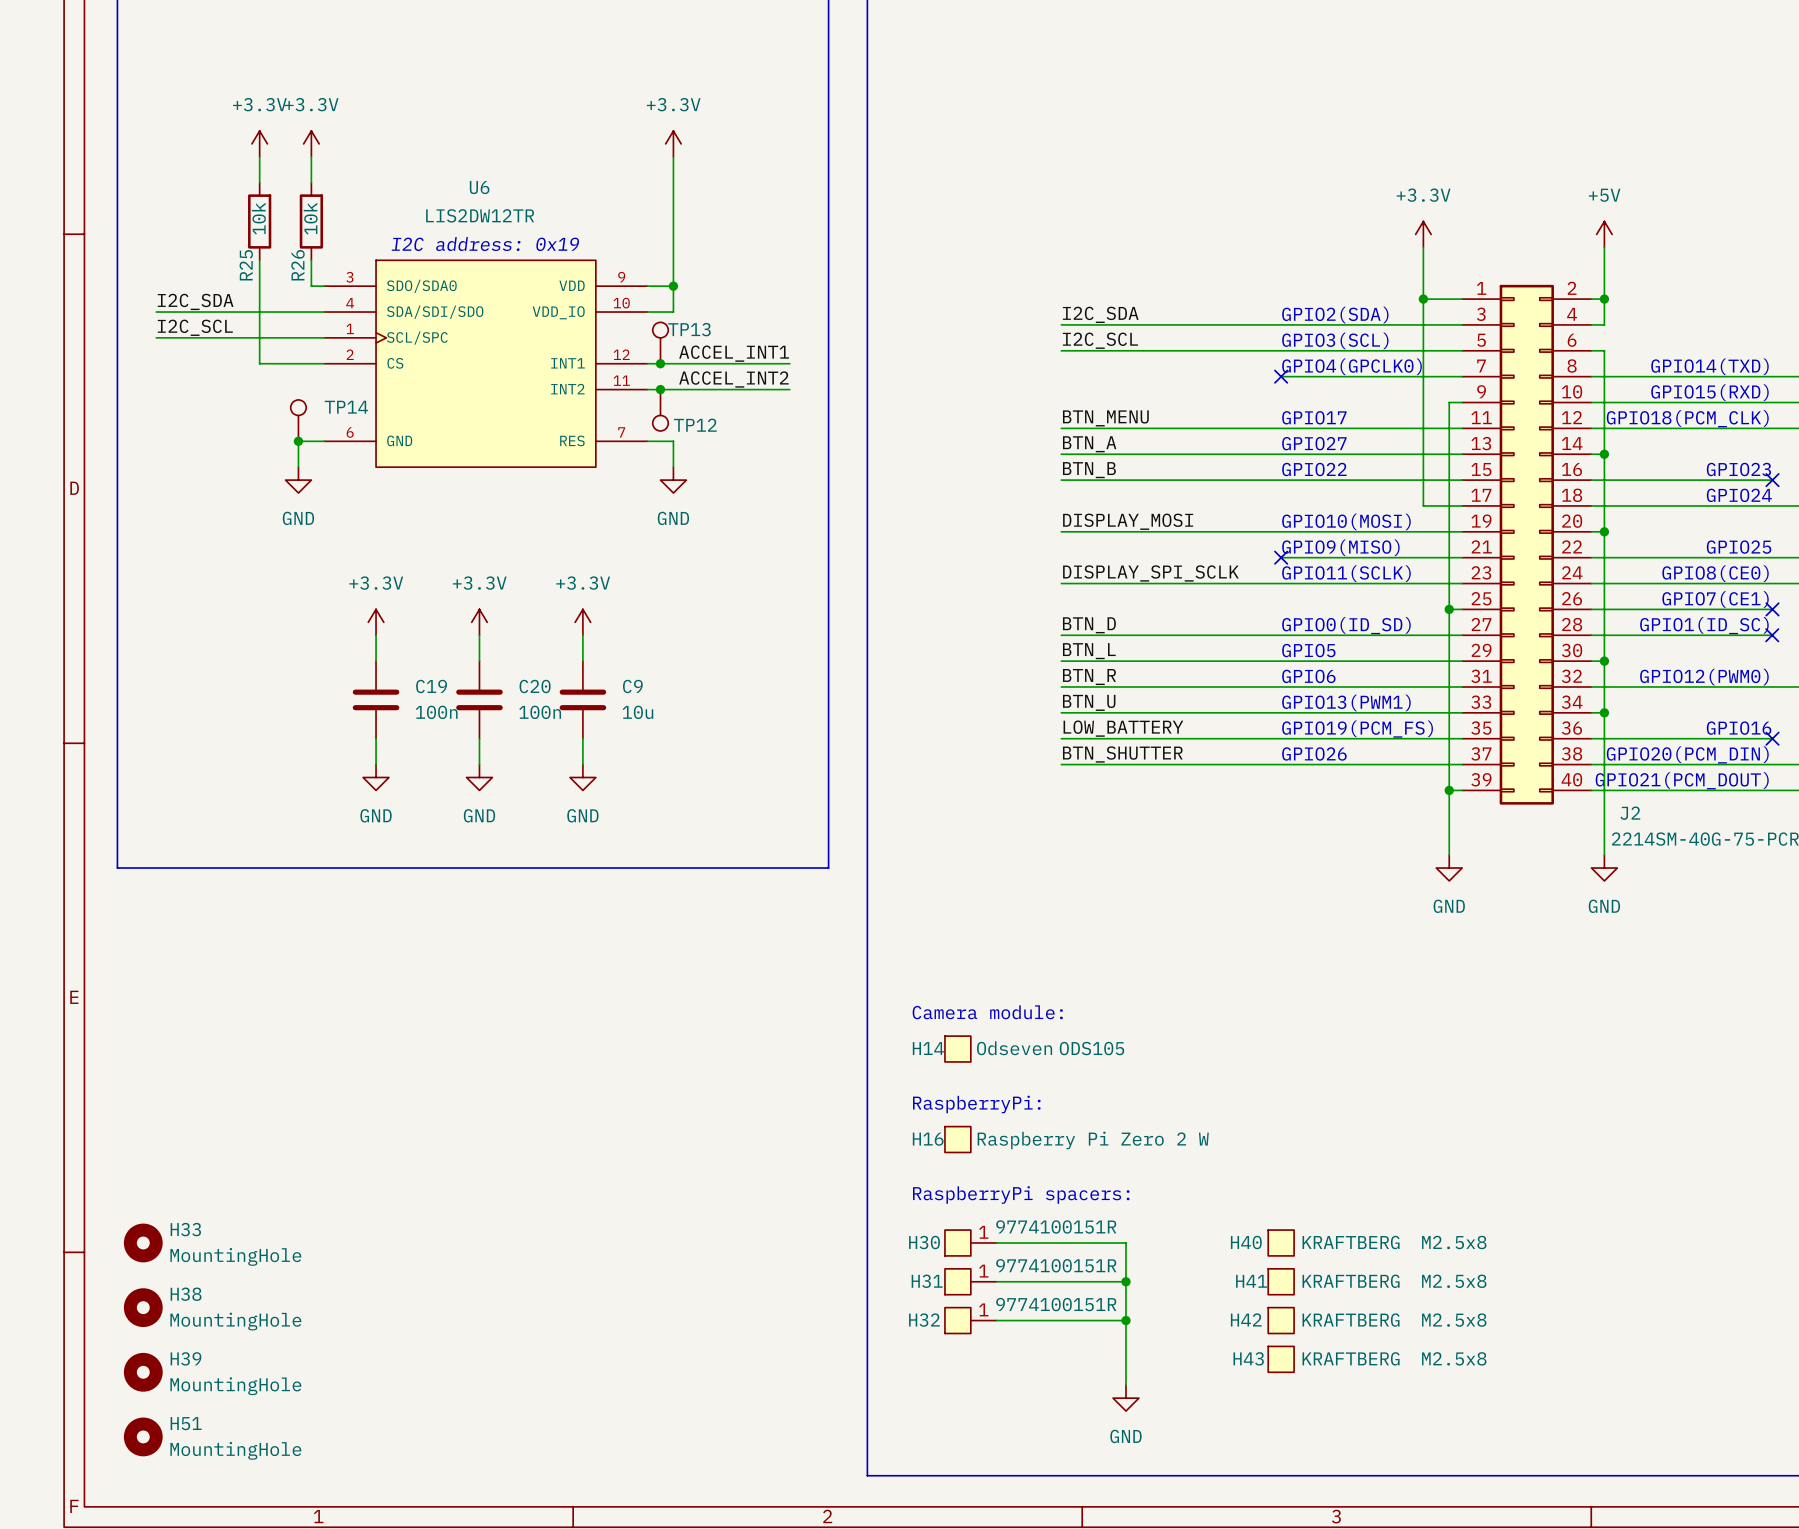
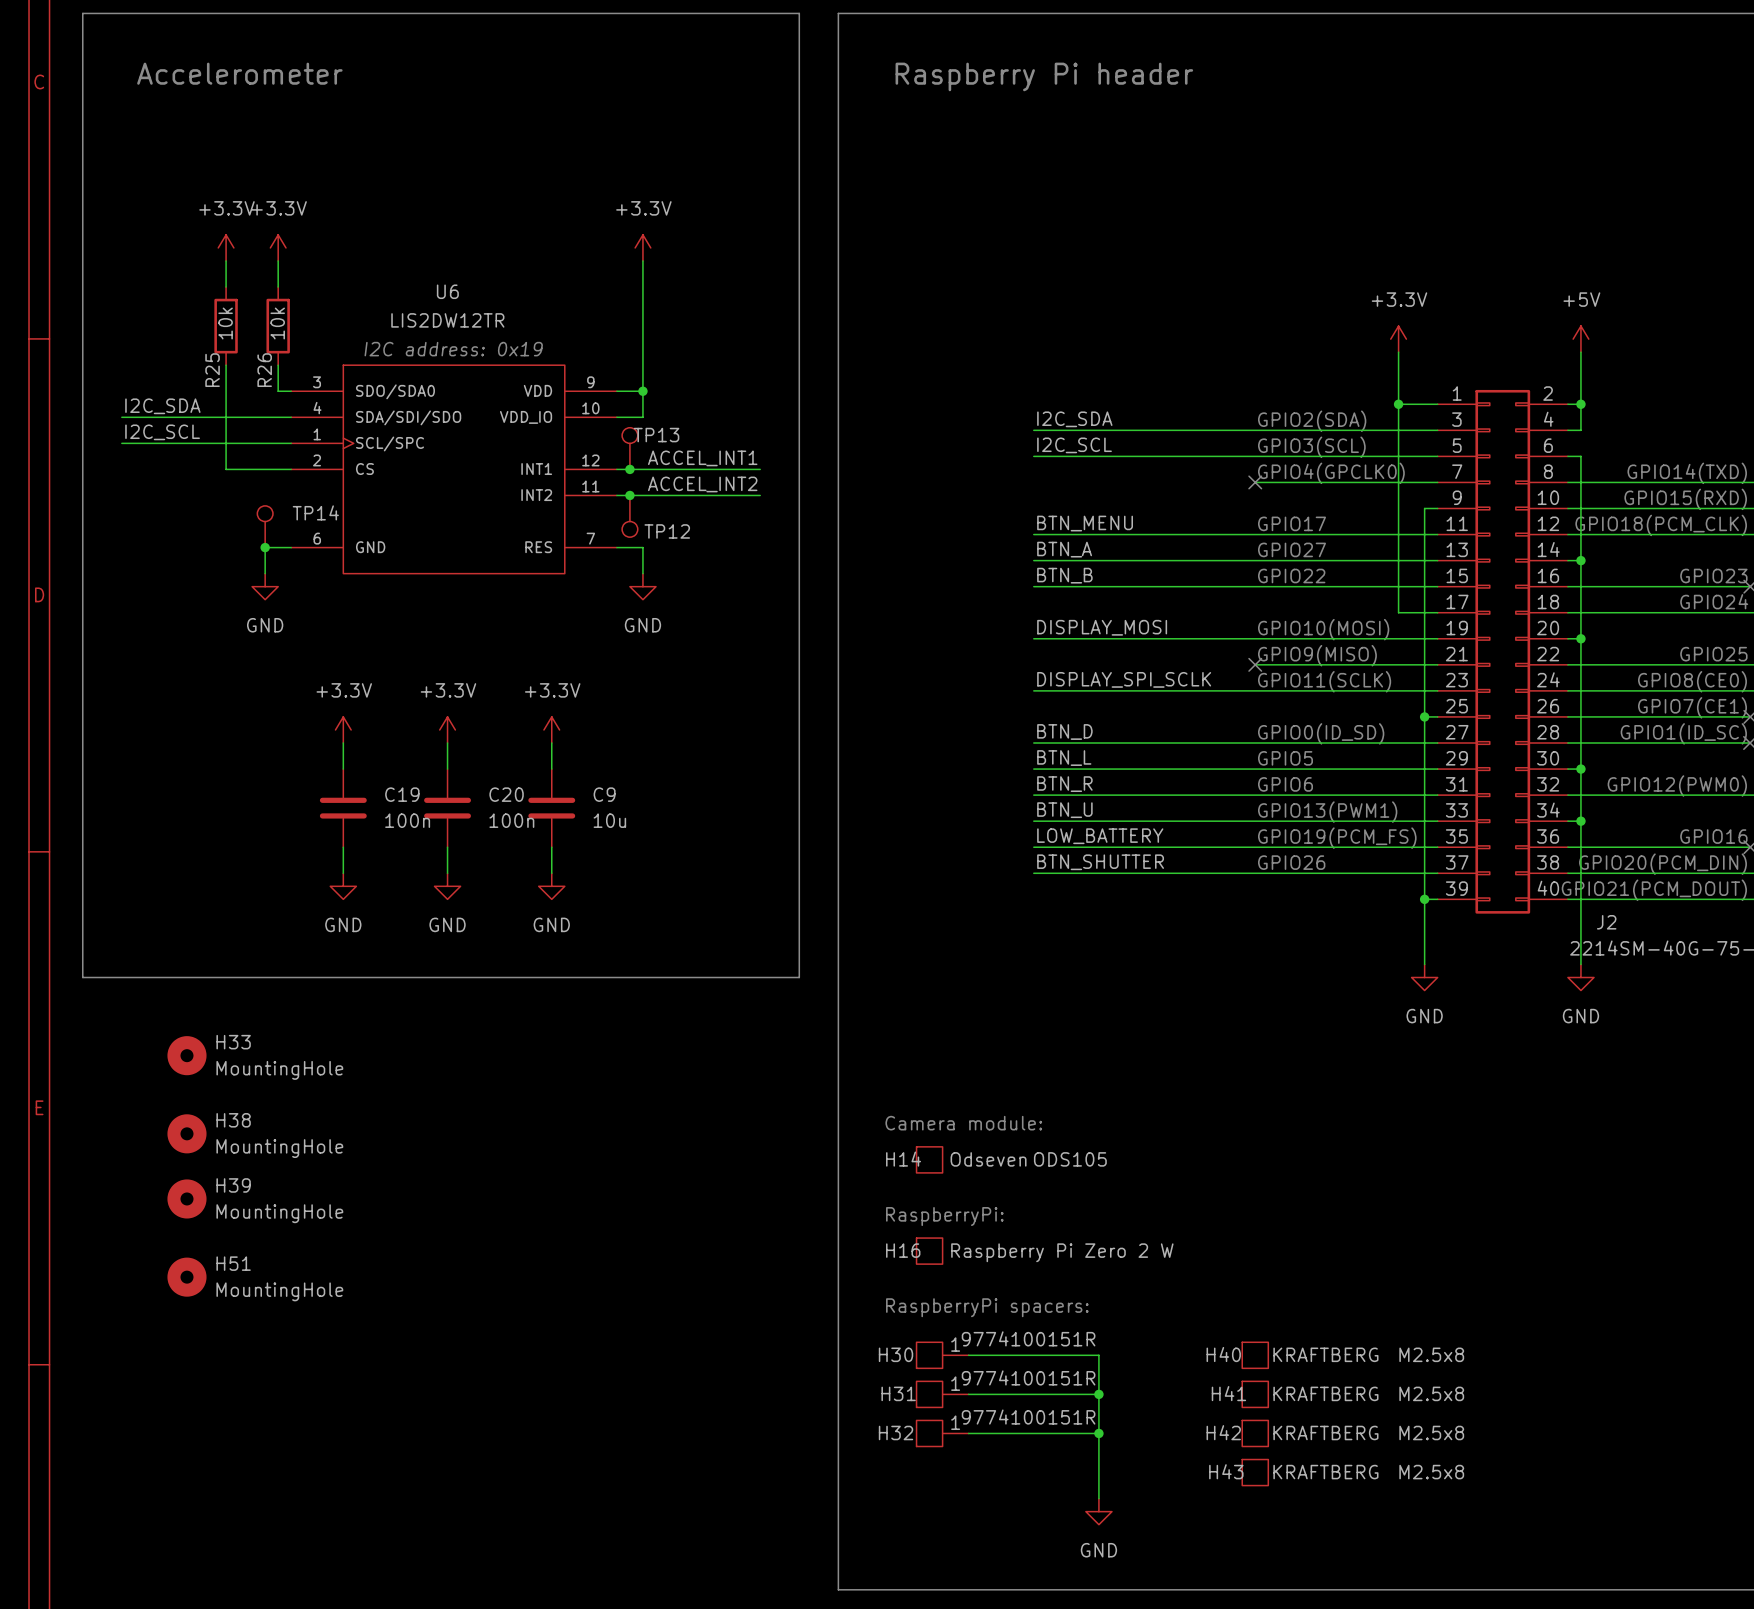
H33 position: (143, 1242) -> (186, 1055)
H38 position: (143, 1307) -> (186, 1133)
H39 position: (143, 1372) -> (186, 1198)
H51 position: (143, 1436) -> (186, 1277)

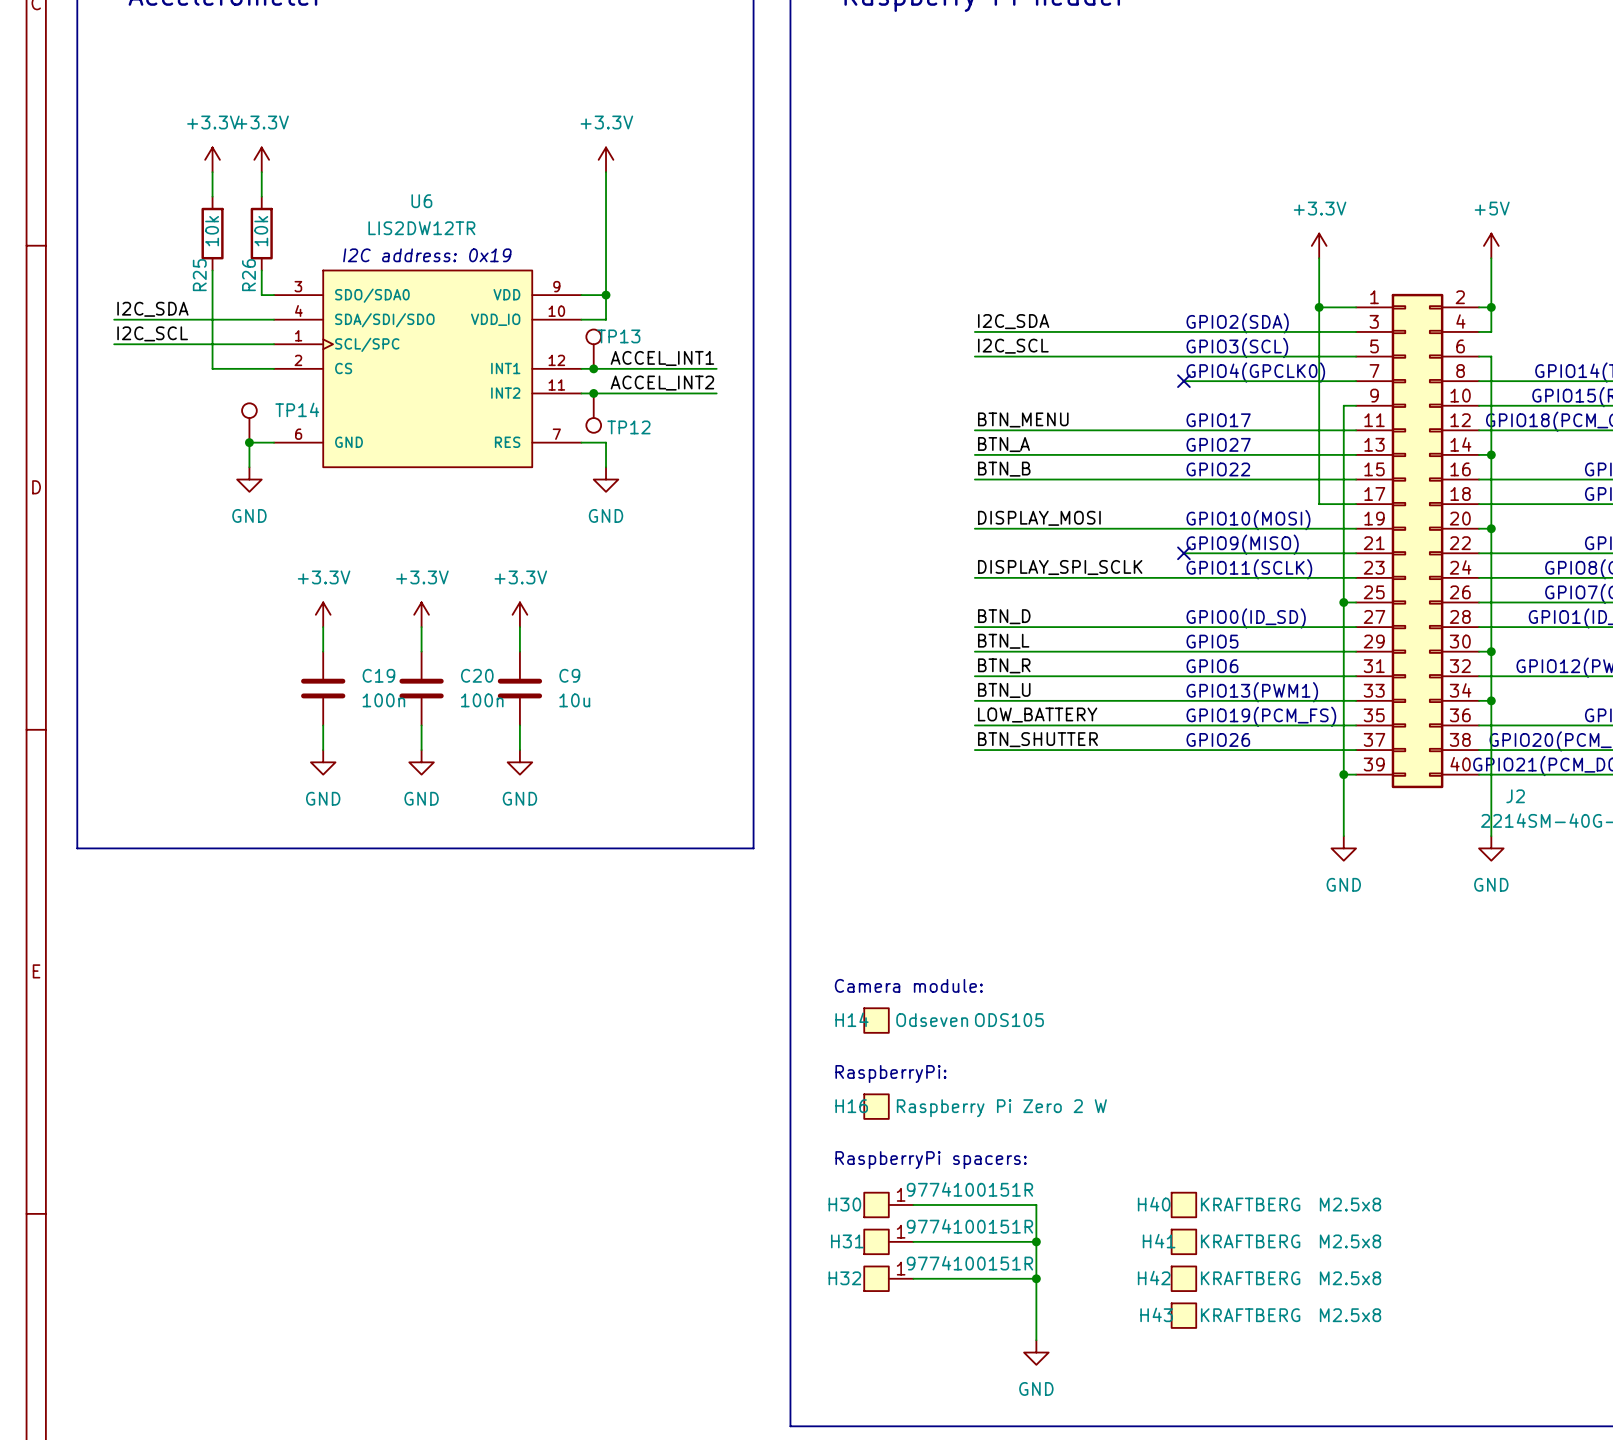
H33: MountingHole (186, 1055) -> none
H38: MountingHole (186, 1133) -> none
H39: MountingHole (186, 1198) -> none
H51: MountingHole (186, 1277) -> none

